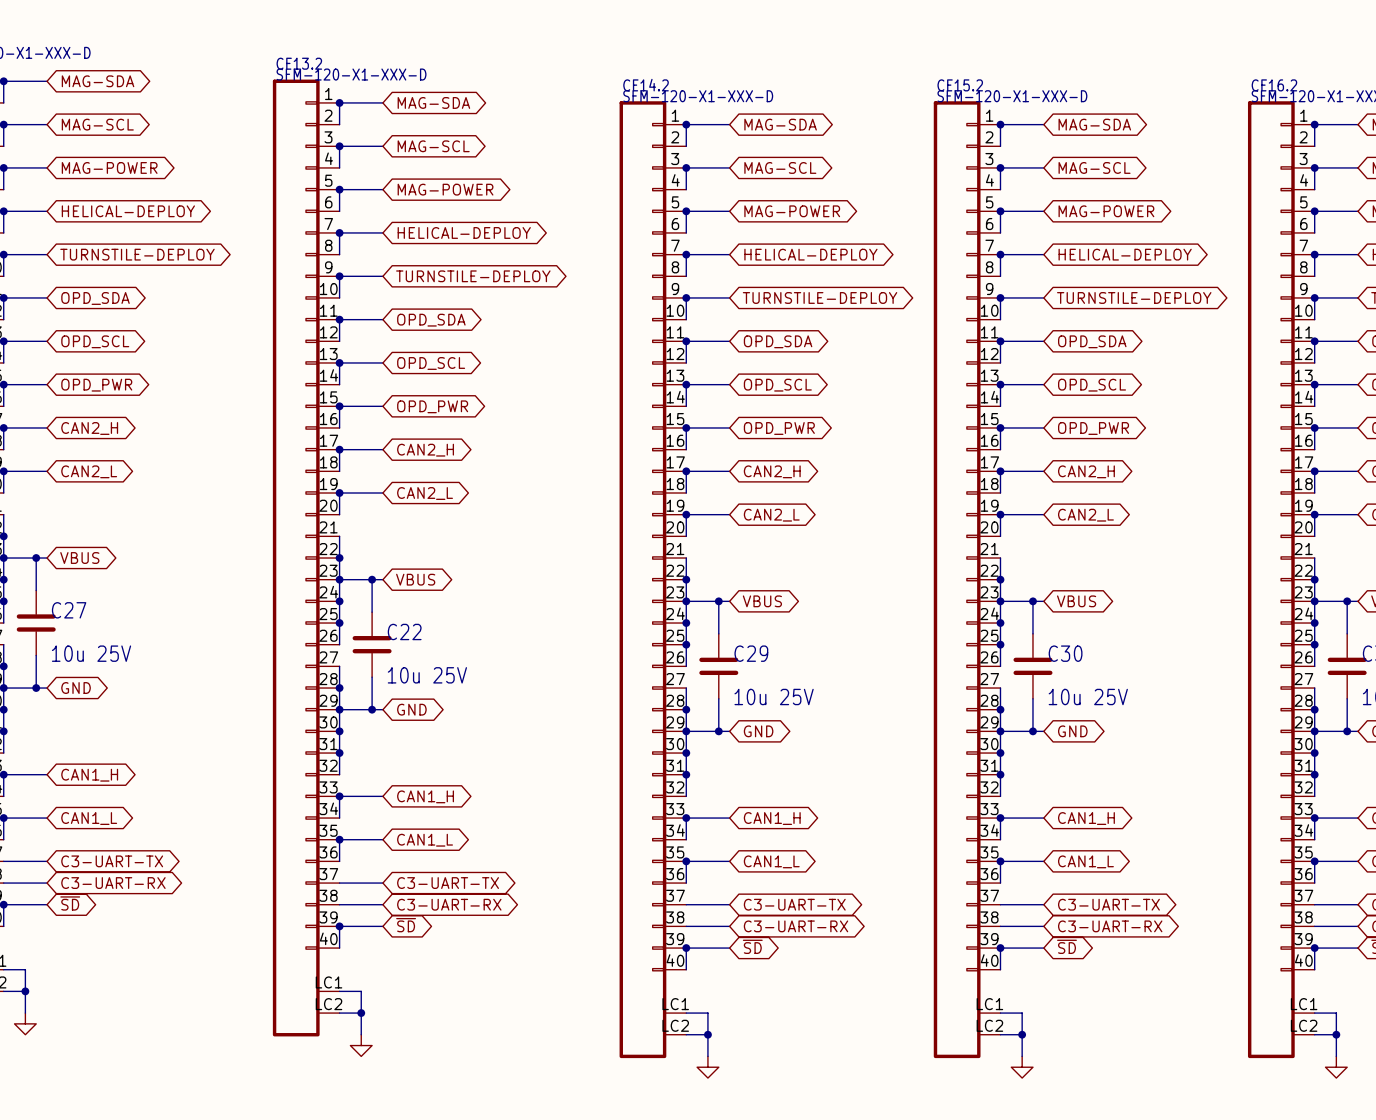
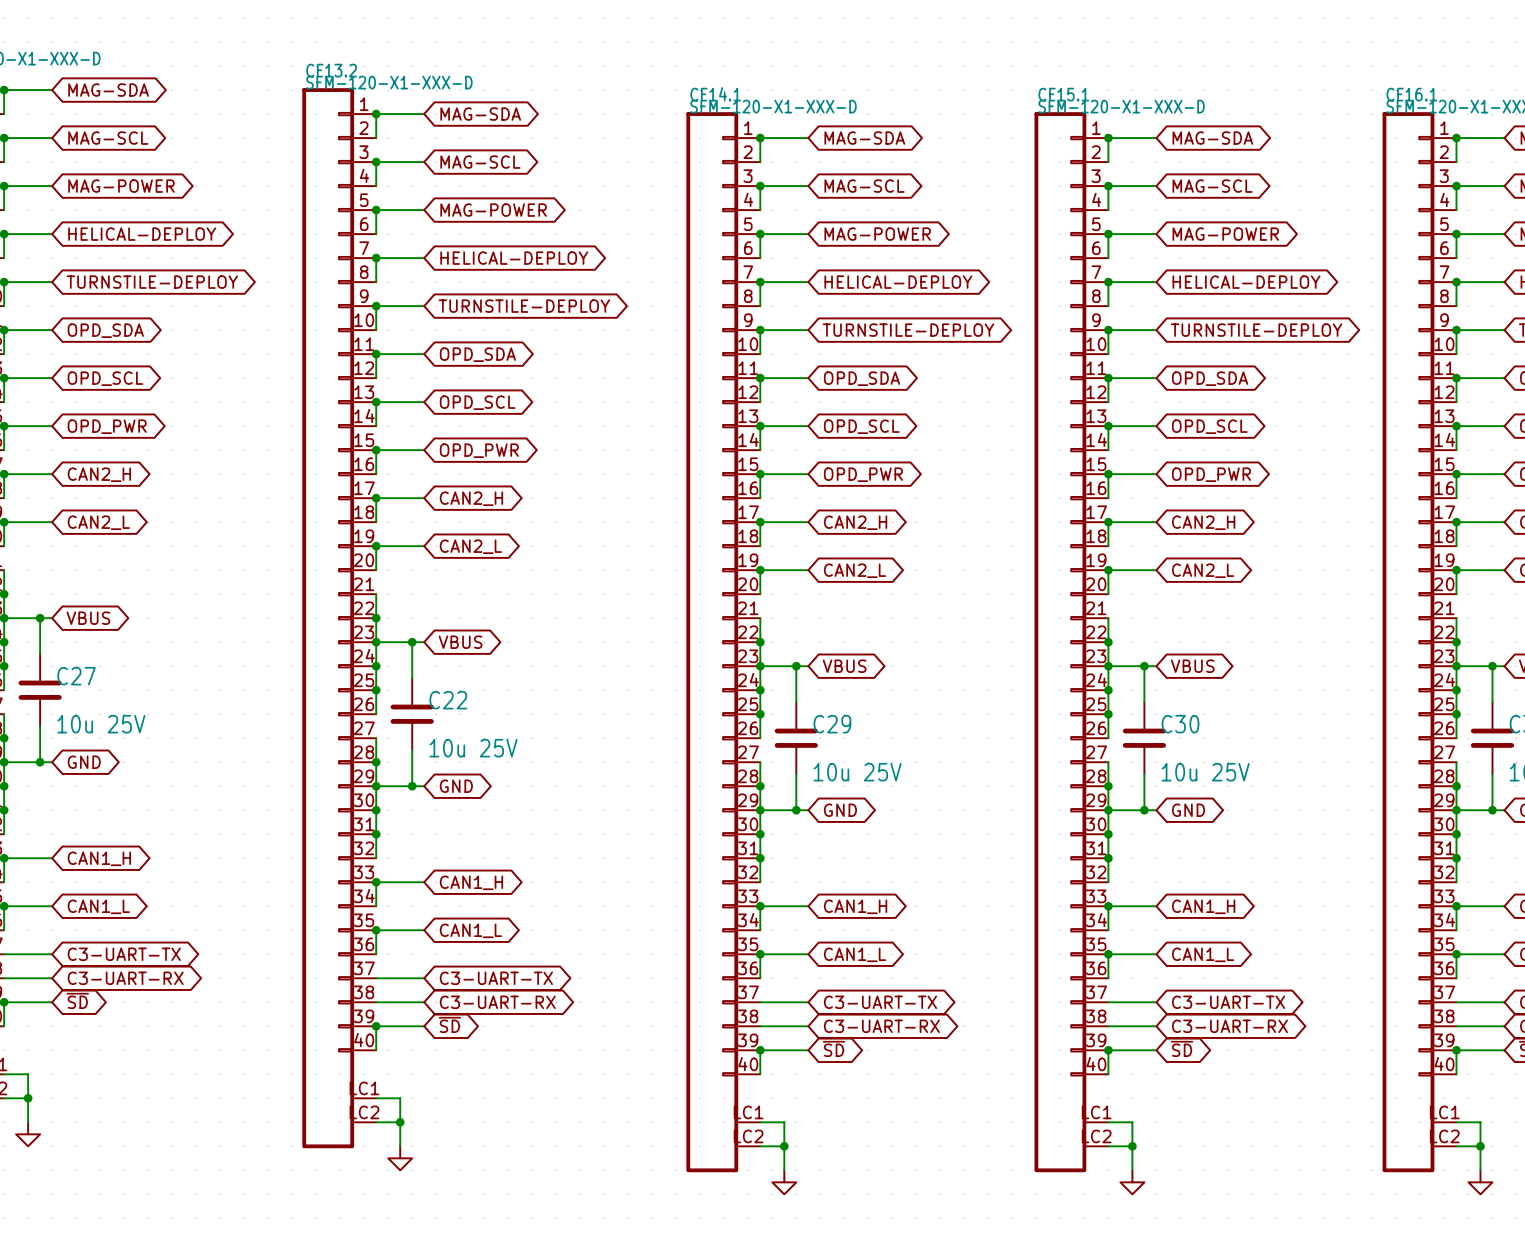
CF14.2 name: CF14.2 (646, 85) -> CF14.1 (715, 94)
CF15.2 name: CF15.2 (960, 85) -> CF15.1 (1063, 94)
CF16.2 name: CF16.2 (1274, 85) -> CF16.1 (1411, 94)

